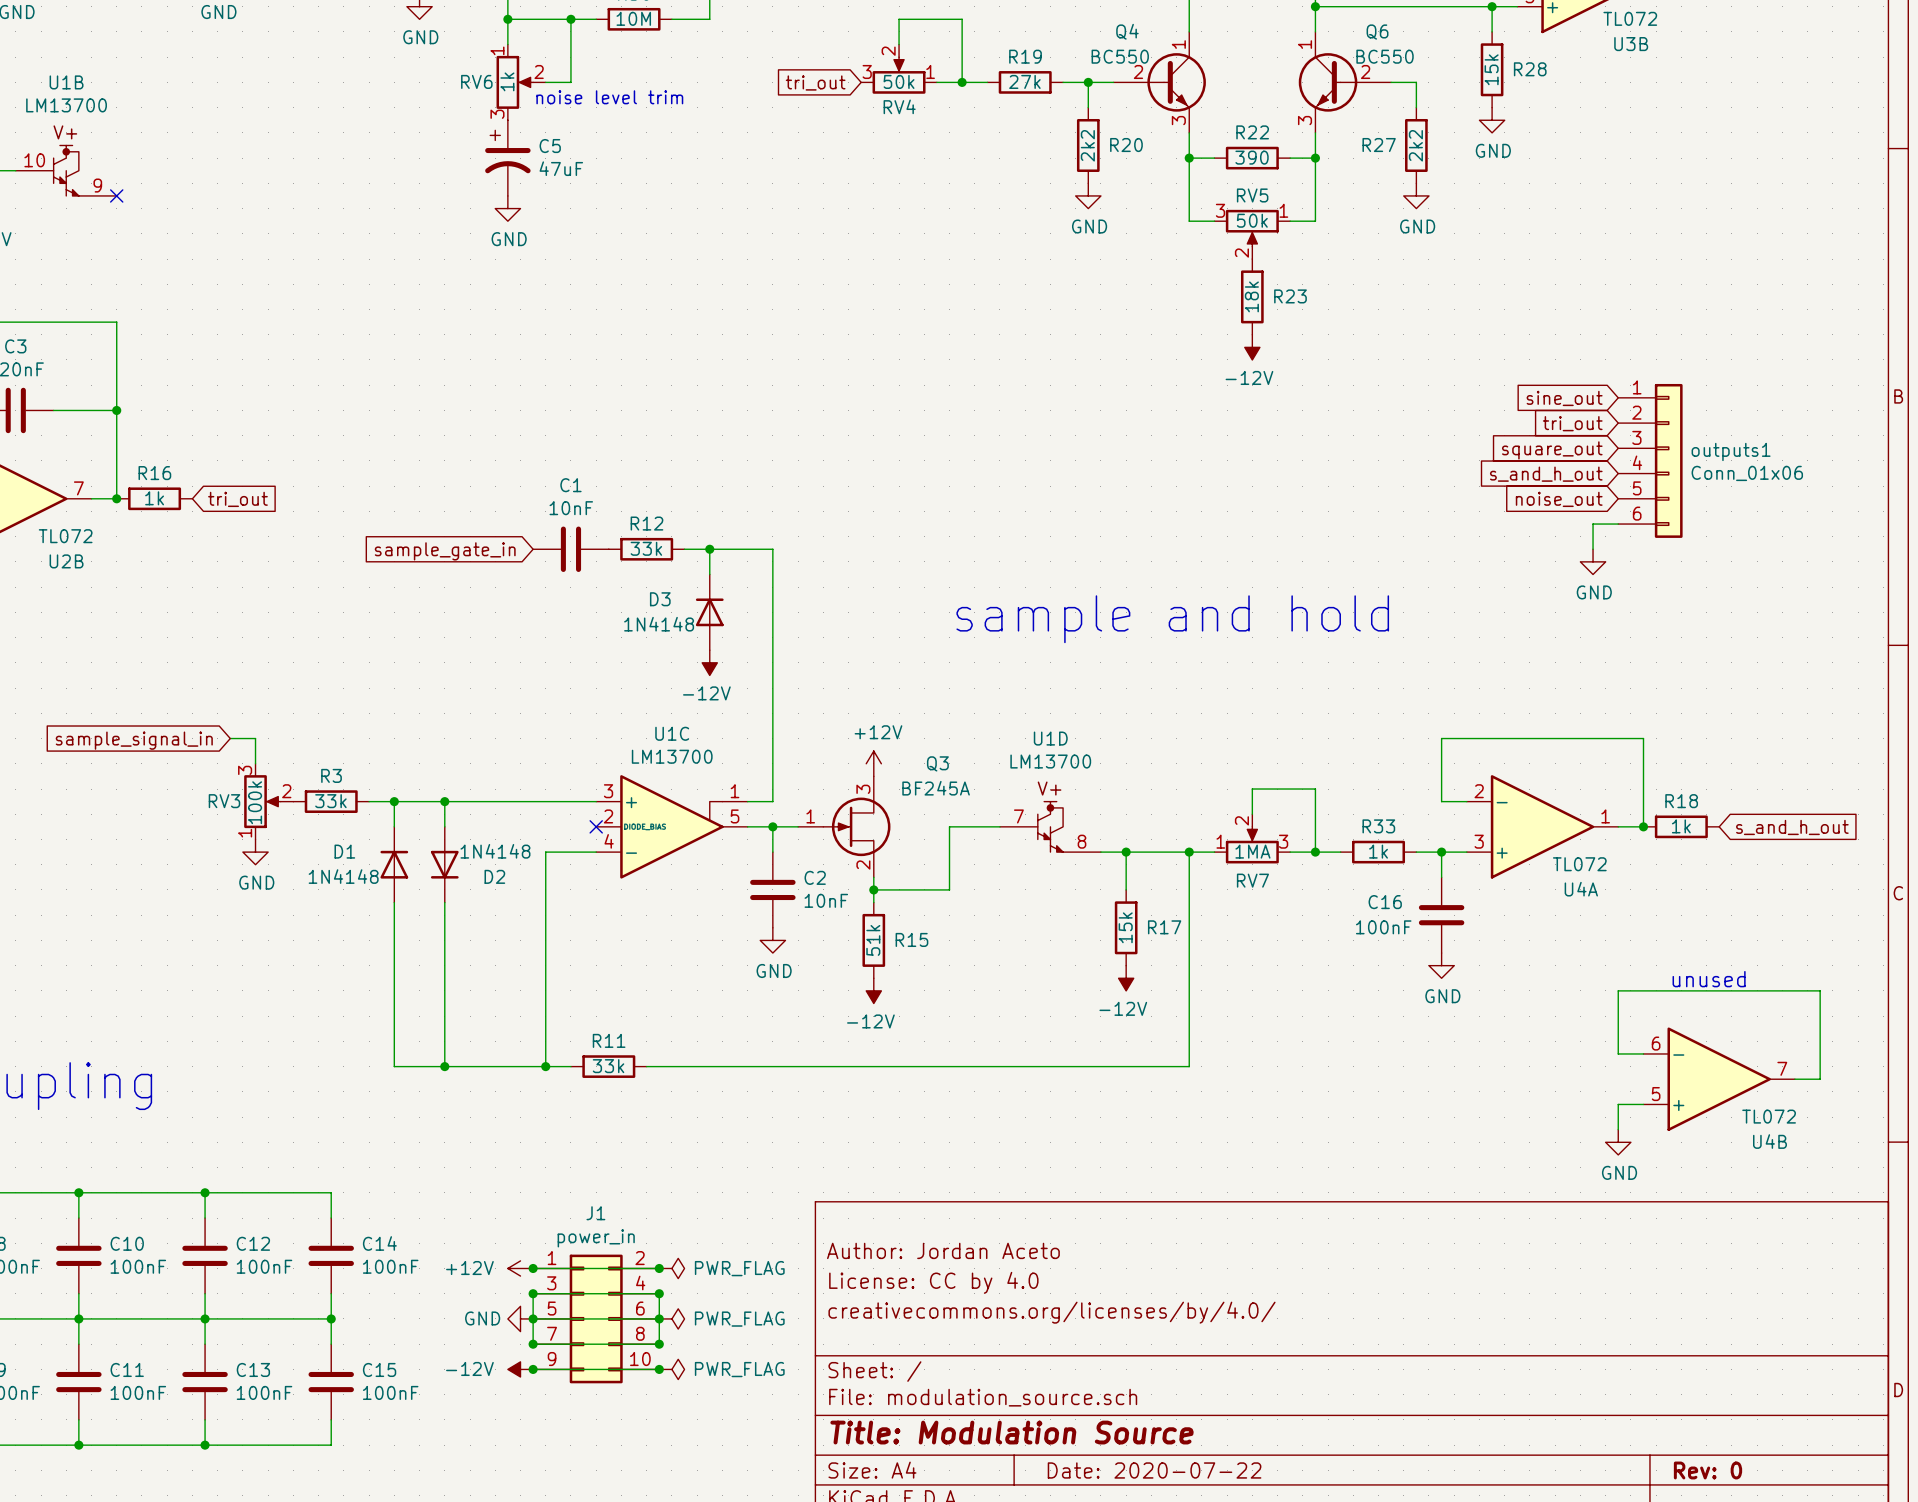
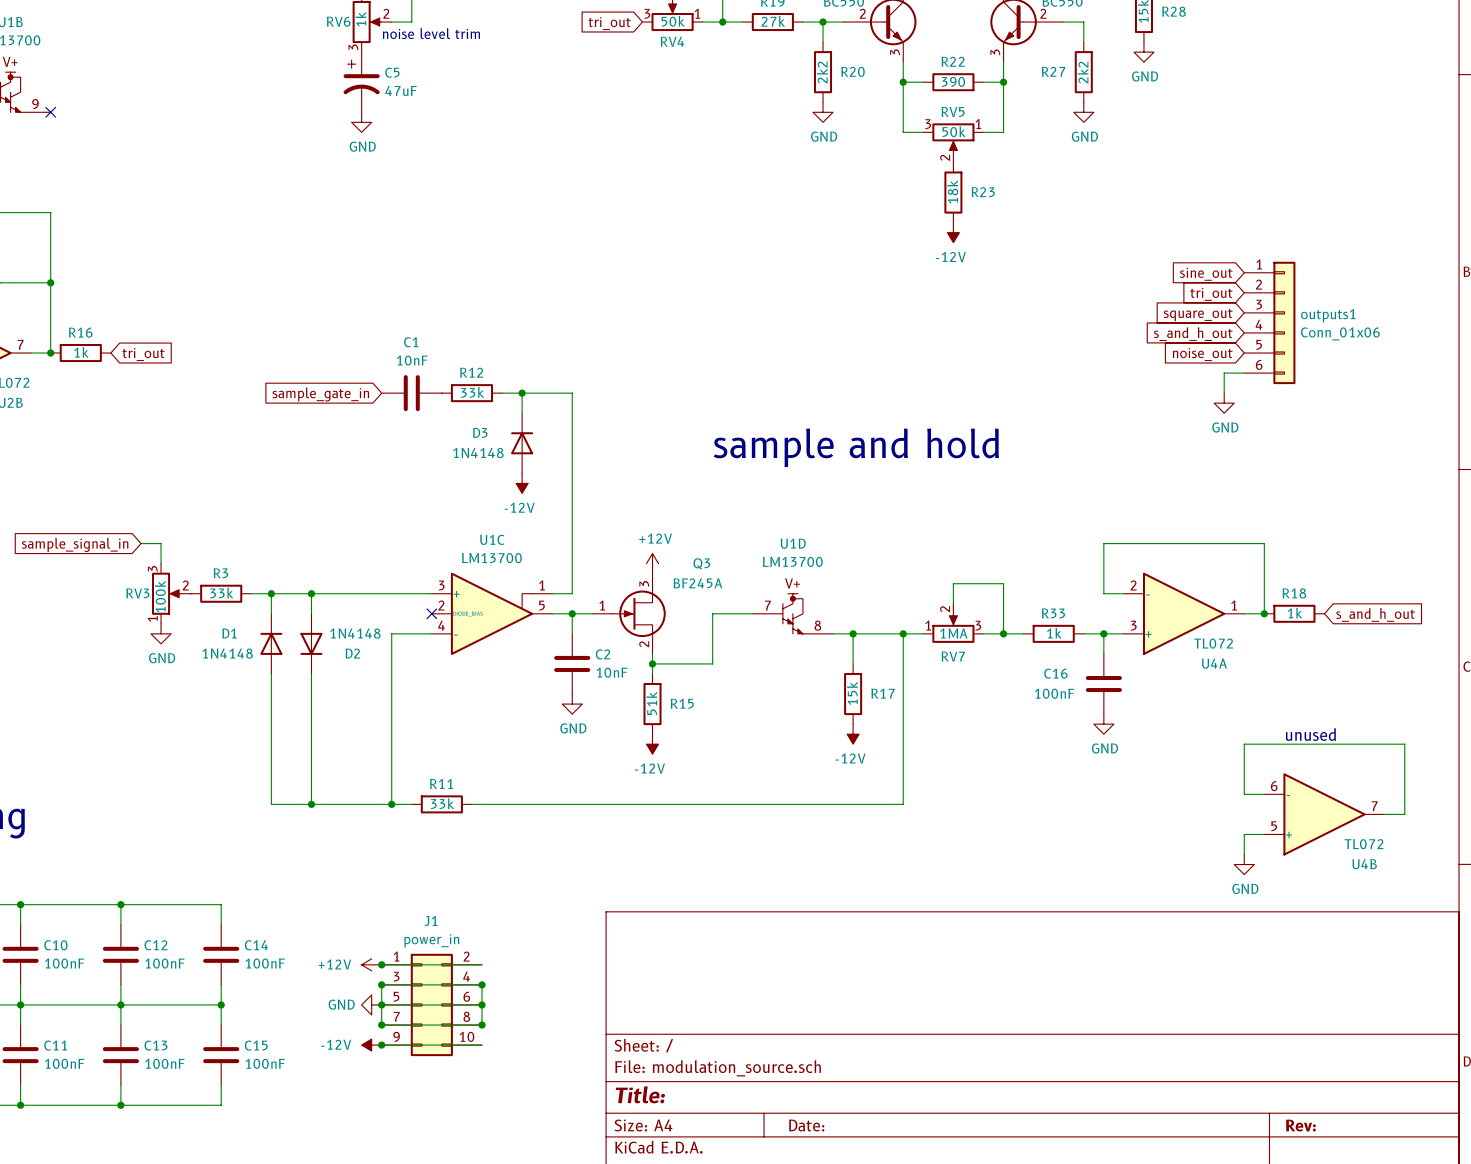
title block: Author: Jordan Aceto (943, 1250) -> none
junction: (659, 1268) -> none
power symbol: PWR_FLAG (671, 1268) -> none
title block: License: CC by 4.0 (933, 1282) -> none
title block: creativecommons.org/licenses/by/4.0/ (1052, 1312) -> none
power symbol: PWR_FLAG (671, 1318) -> none
junction: (659, 1369) -> none
power symbol: PWR_FLAG (671, 1369) -> none
title block: Title: Modulation Source (1011, 1432) -> Title: (640, 1094)
title block: Date: 2020-07-22 (1154, 1470) -> Date: (806, 1125)
title block: Rev: 0 (1708, 1470) -> Rev: (1300, 1125)

